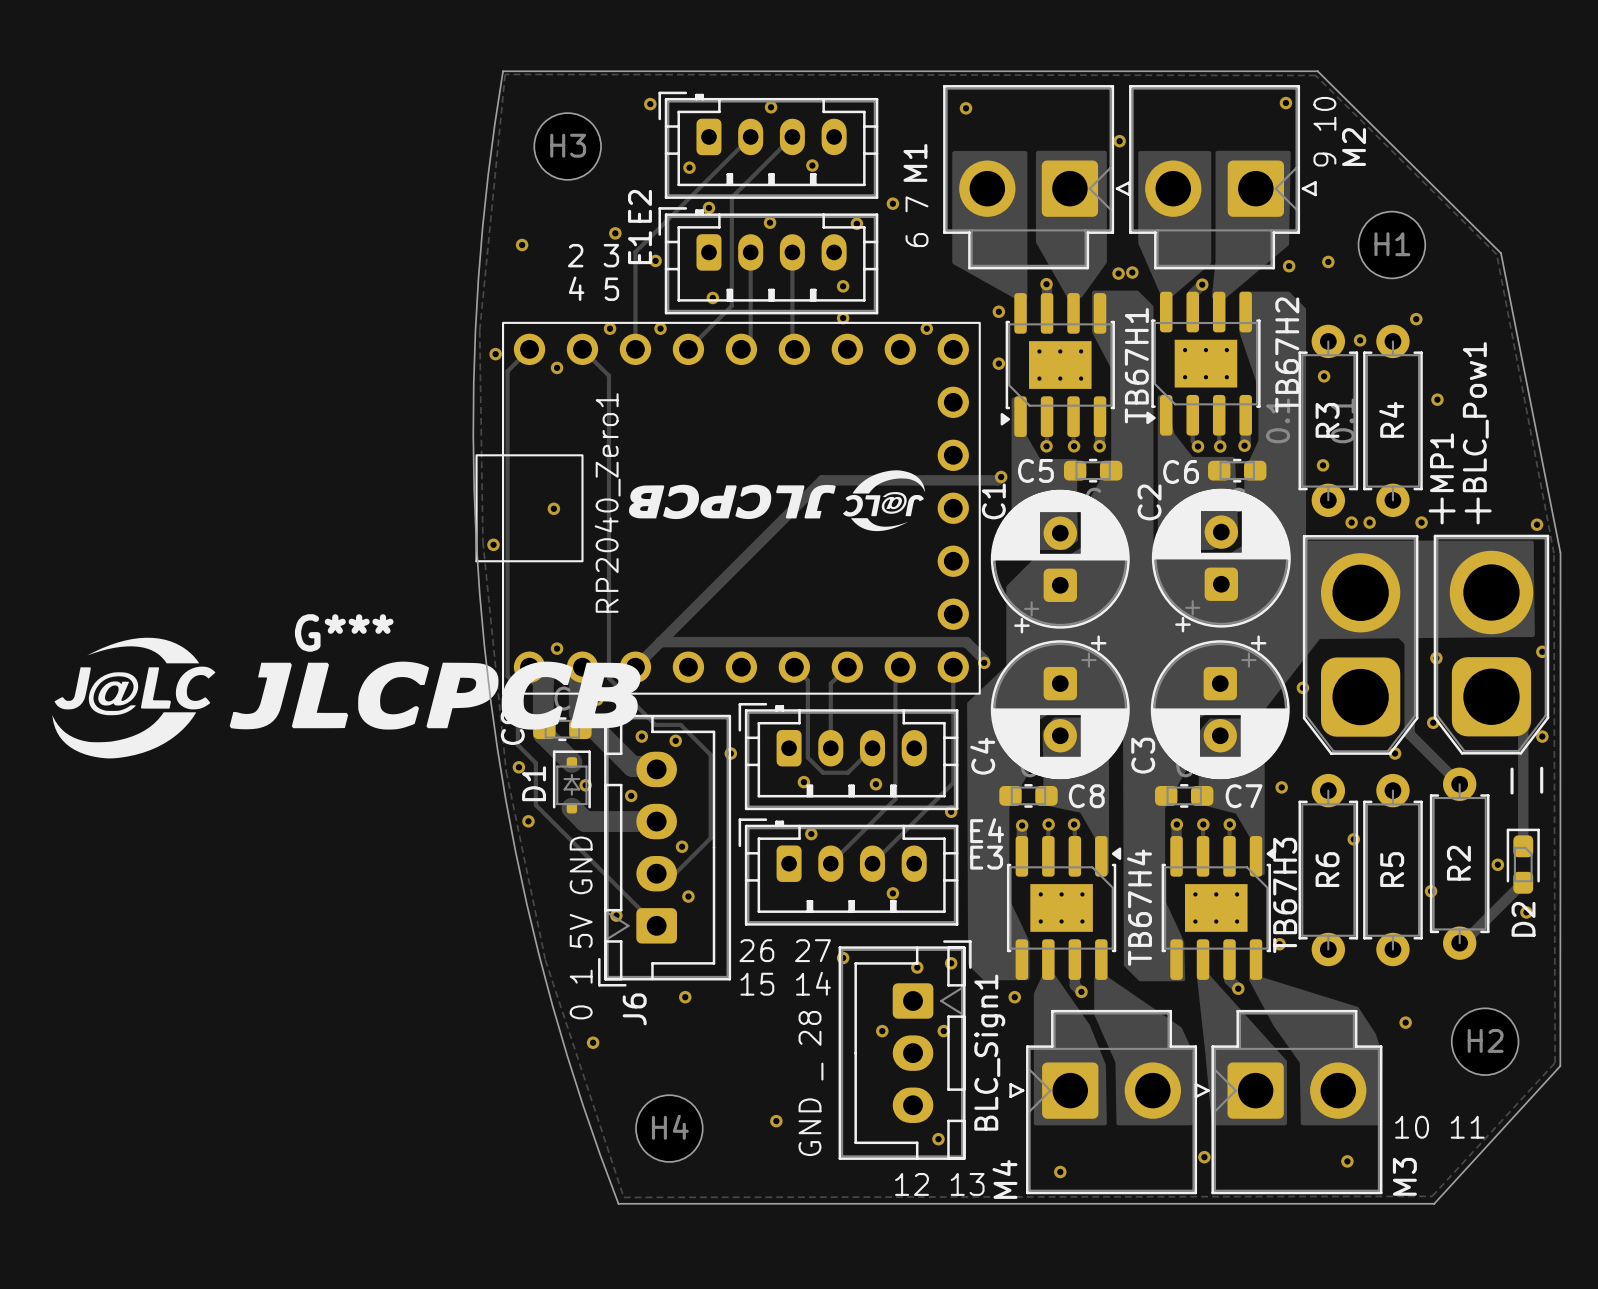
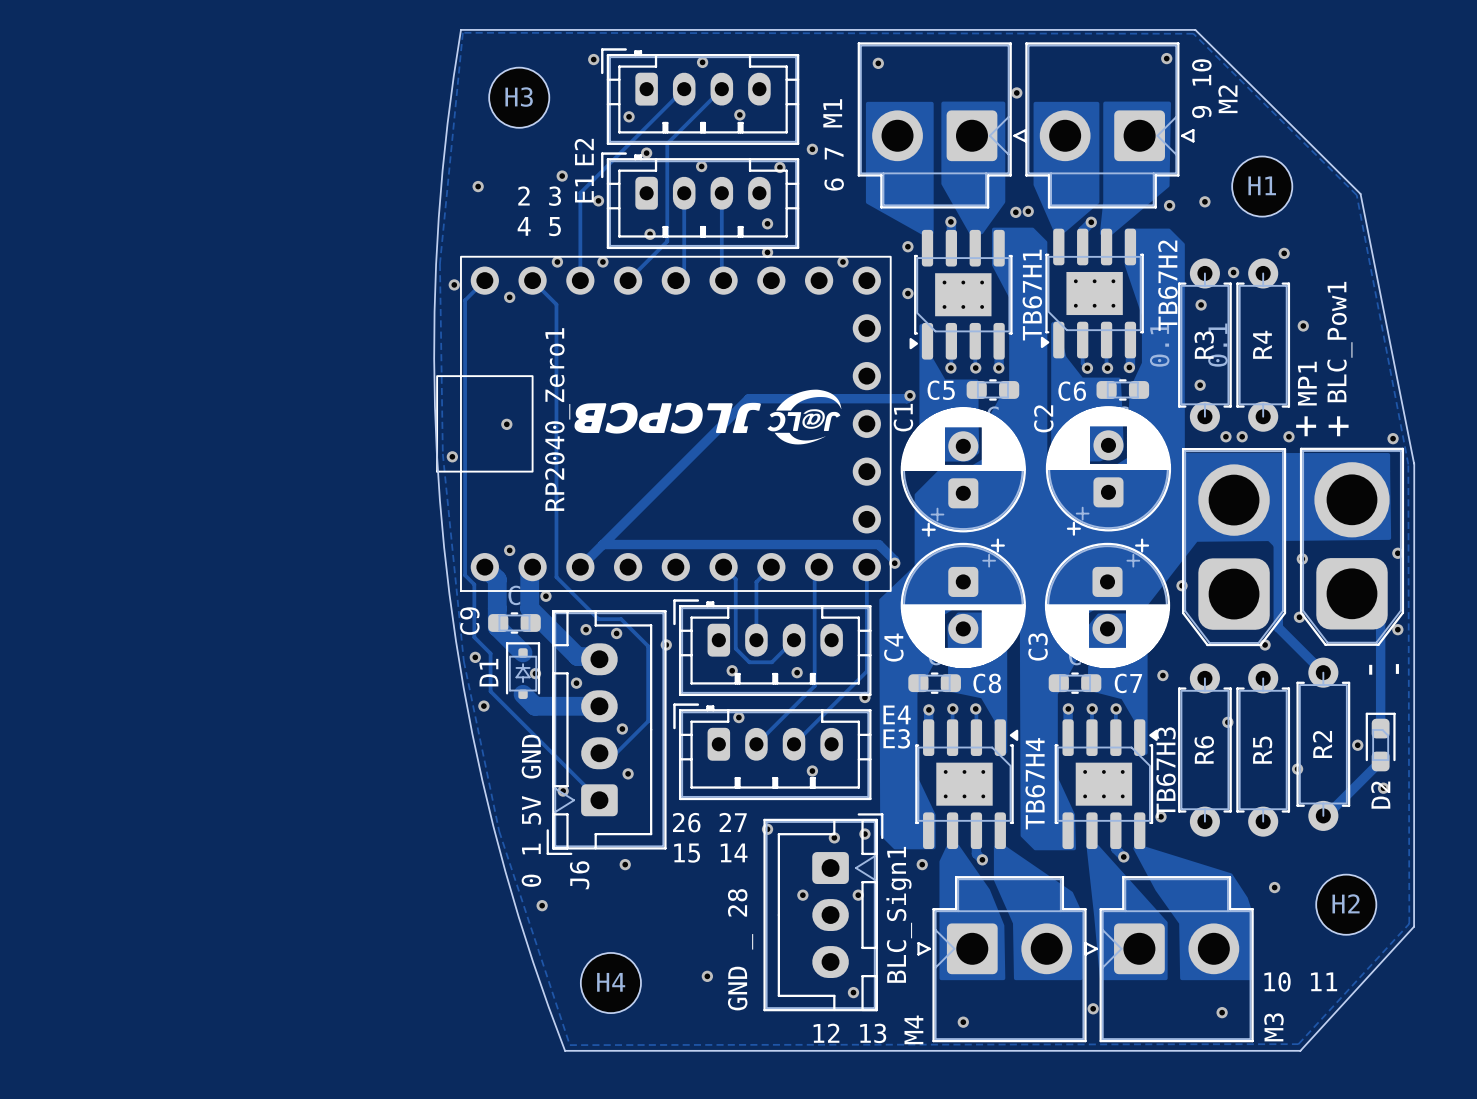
G***: (346, 698) -> none

